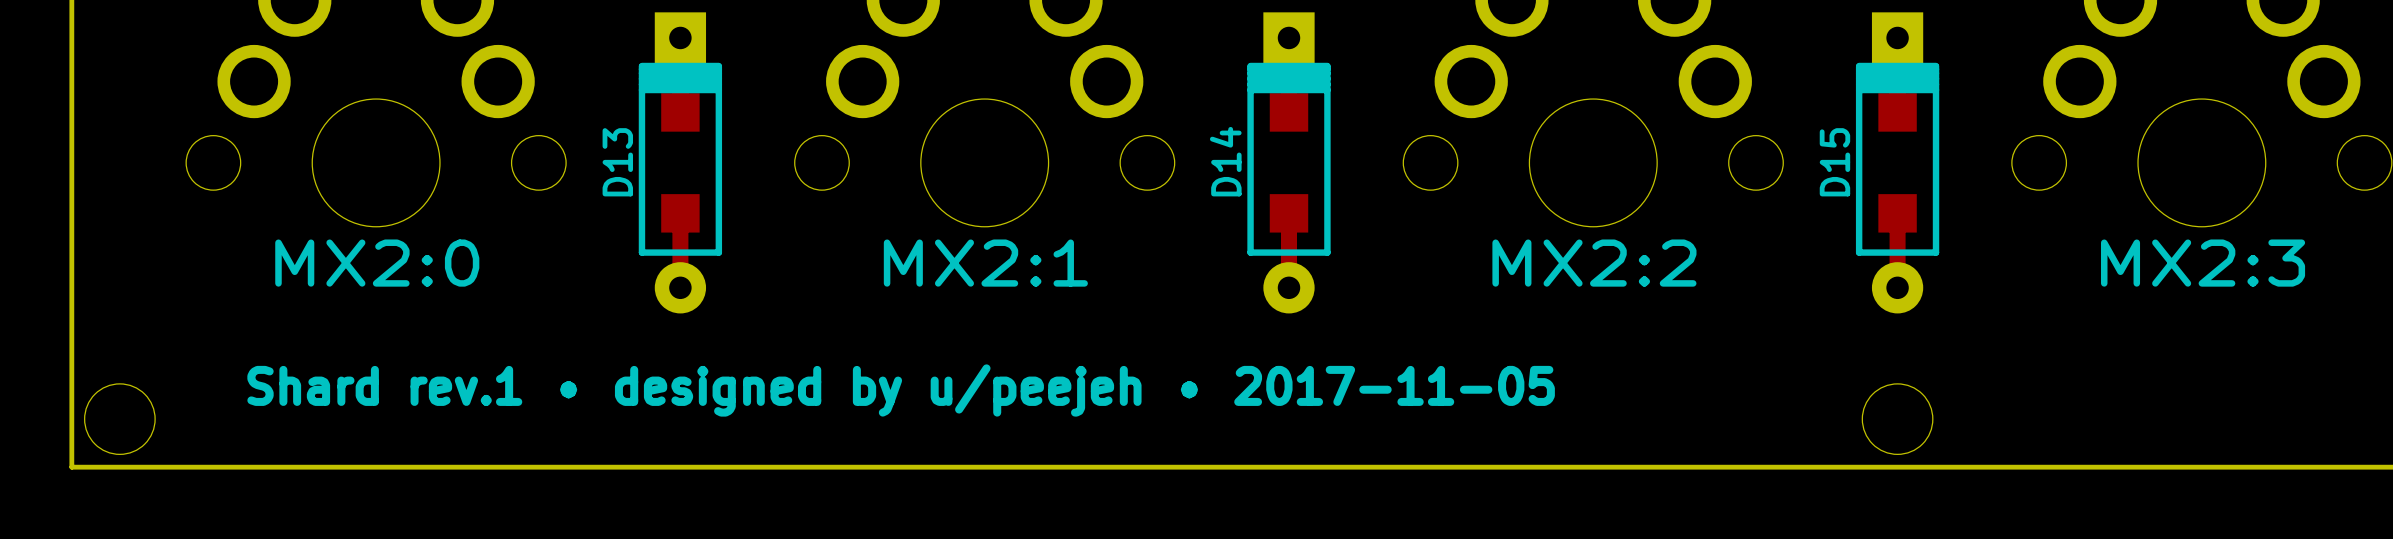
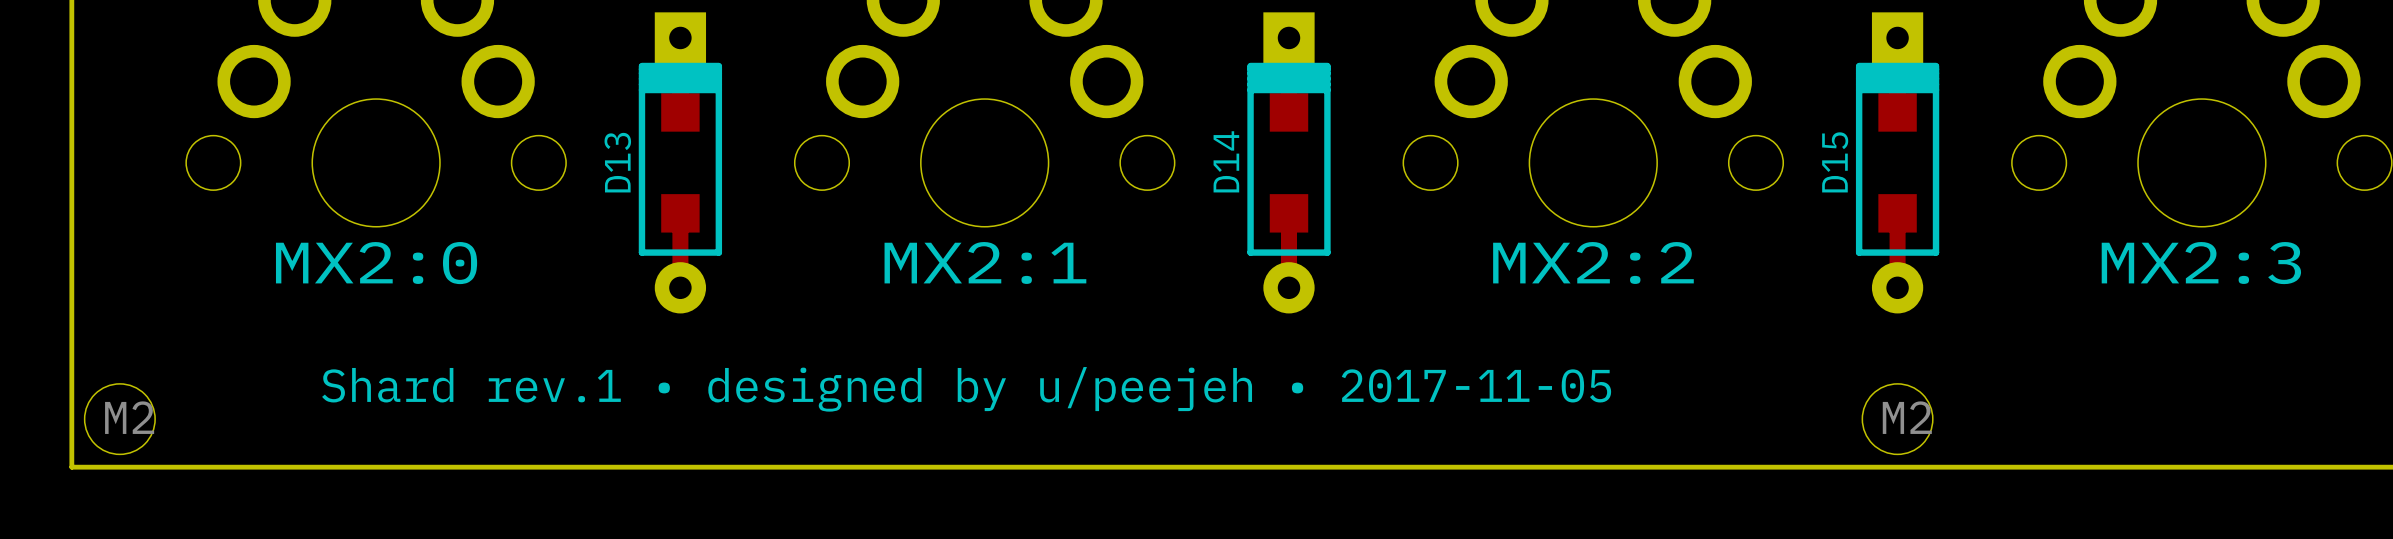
text position: Shard rev.1 • designed by u/peejeh • 2017-11-05 (901, 390) -> Shard rev.1 • designed by u/peejeh • 2017-11-05 (966, 389)
M2 name: none -> M2 (129, 417)
M2 name: none -> M2 (1907, 417)

